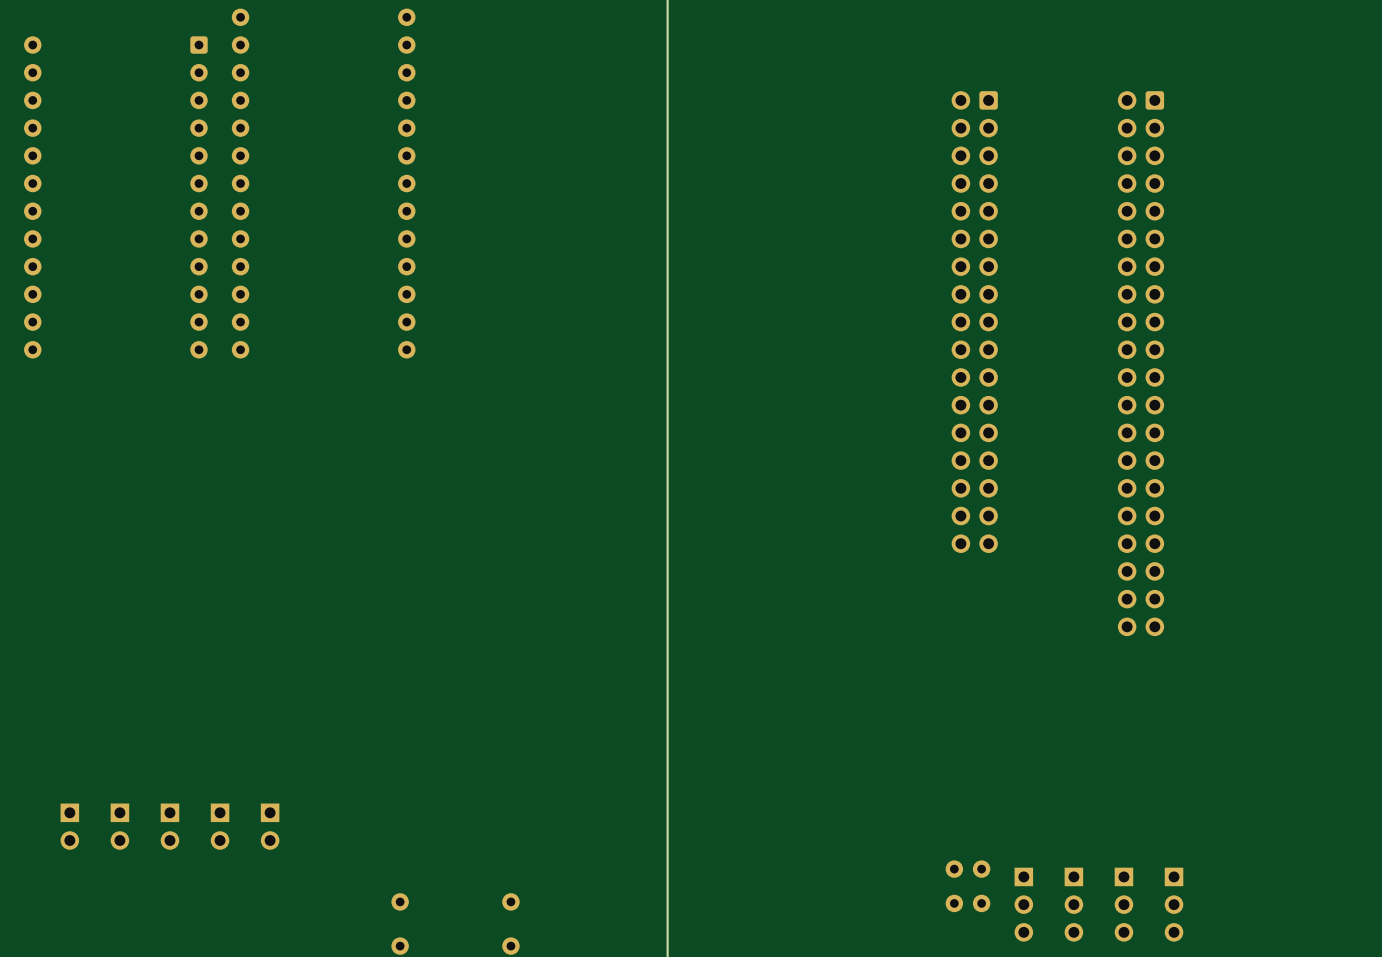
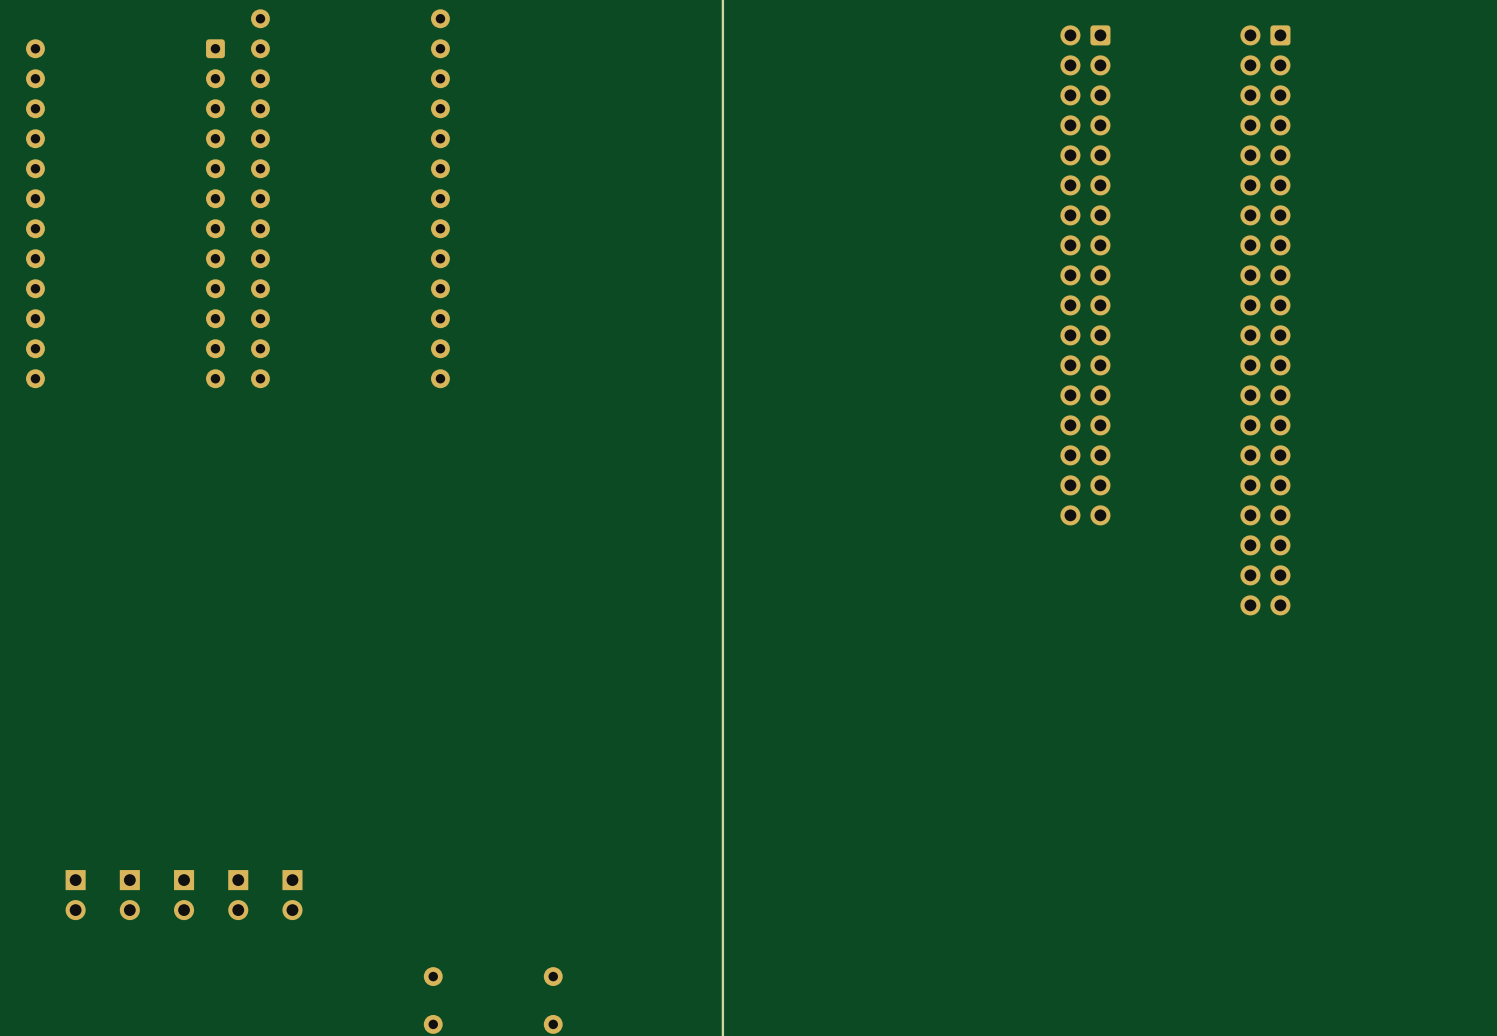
part position: (974, 322) -> (1085, 275)
part position: (1140, 363) -> (1265, 320)
part: (967, 869) -> none
part: (967, 903) -> none
part: (1023, 904) -> none
part: (1073, 904) -> none
part: (1123, 904) -> none
part: (1174, 904) -> none

